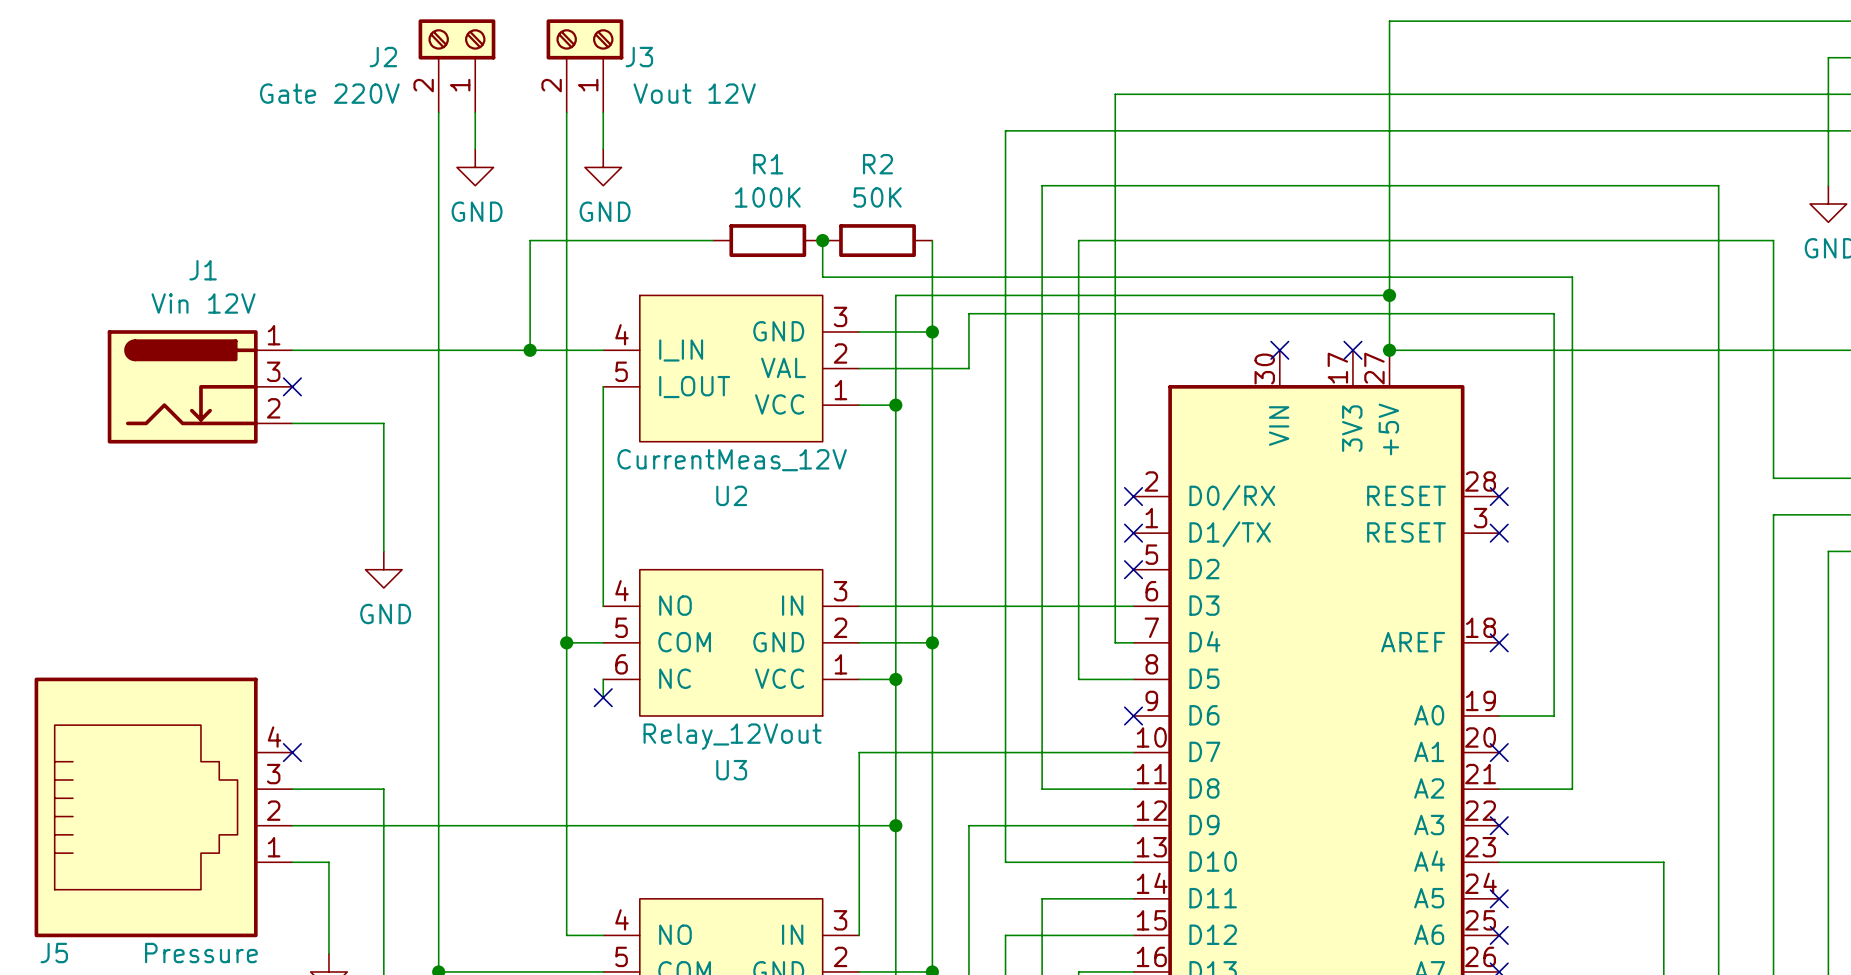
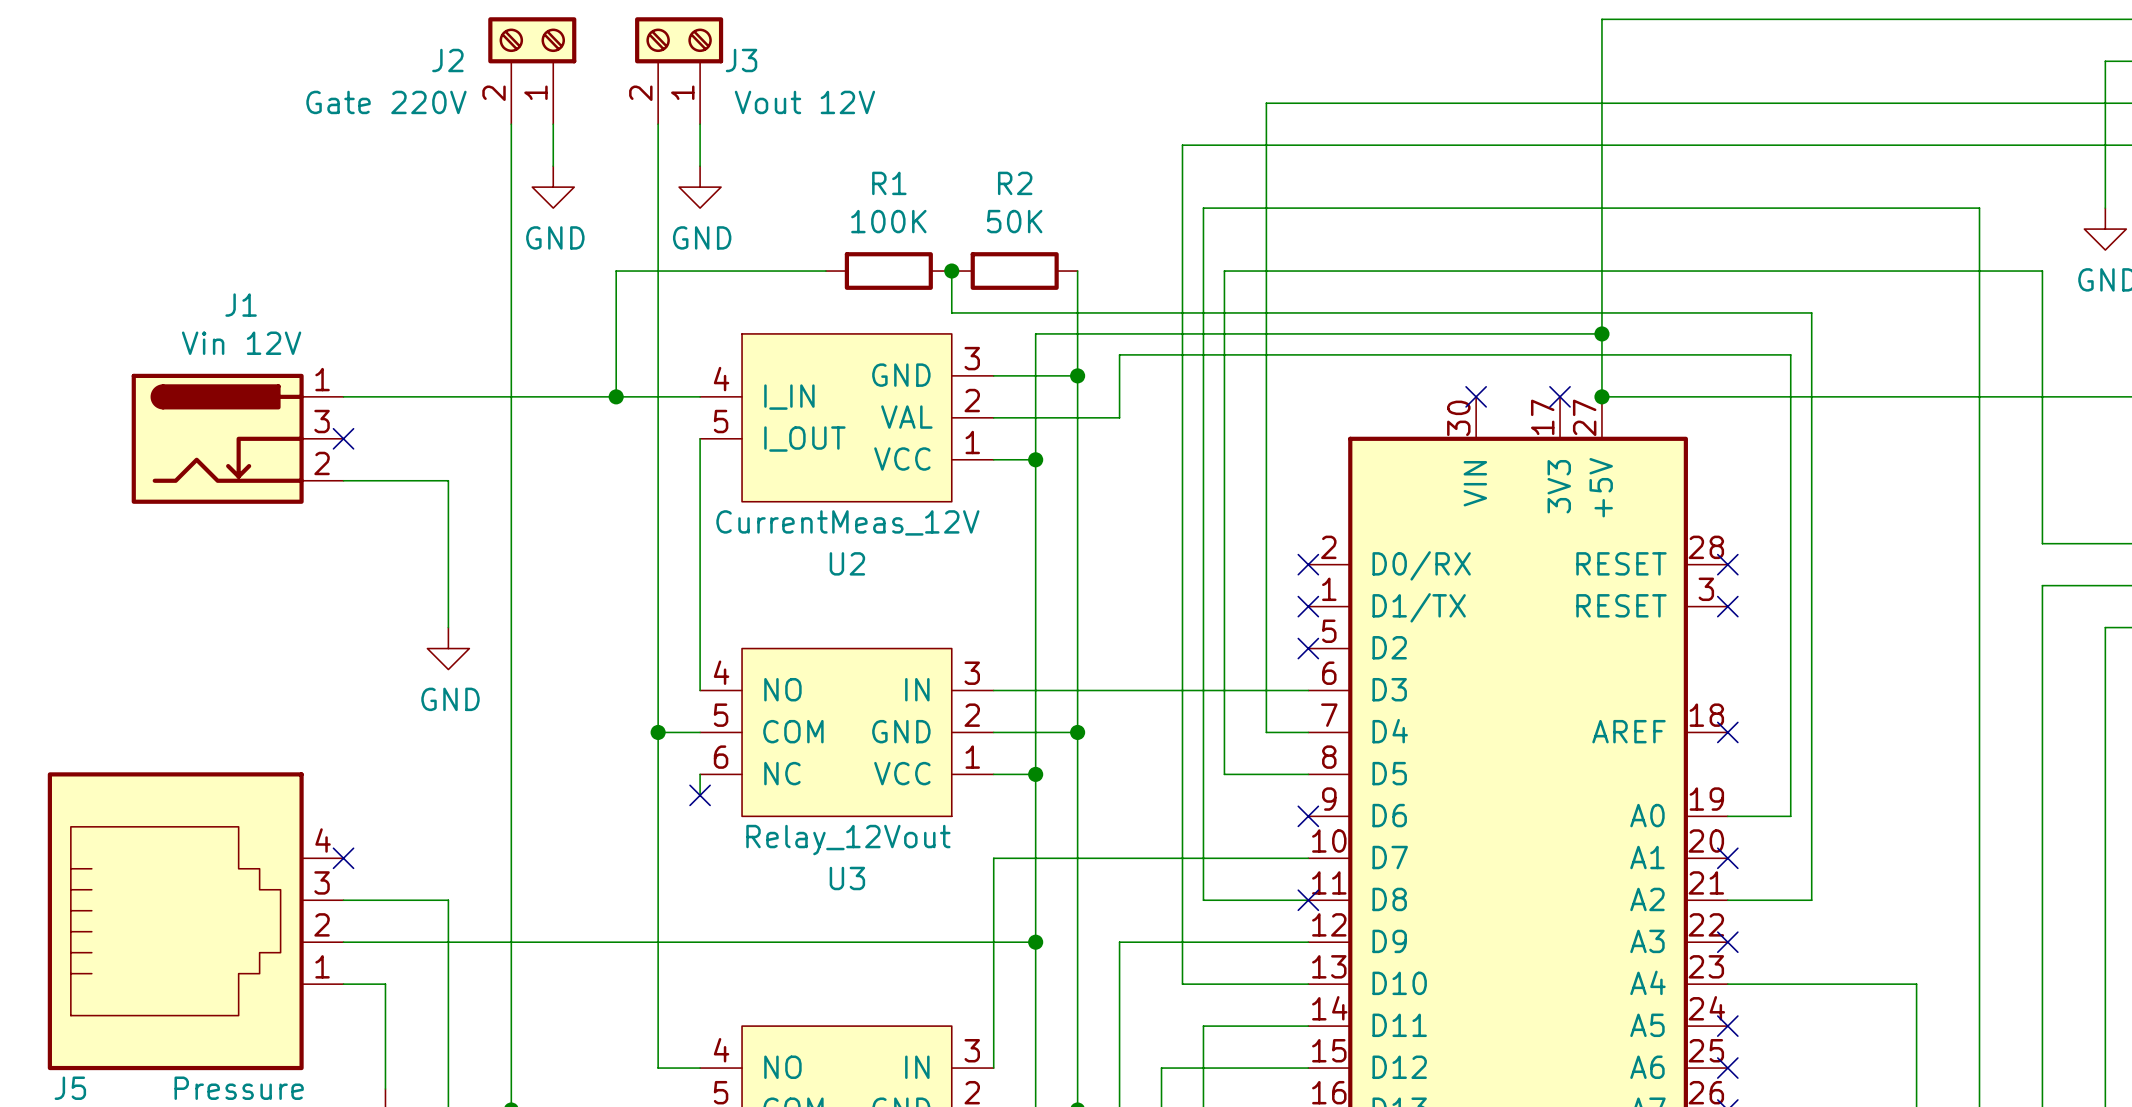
wire: (1115, 94) (1115, 642) -> (1287, 103) (1266, 103) (1266, 732) (1287, 732)
wire: (1023, 130) (1005, 130) (1005, 862) (1023, 862) -> (1182, 145) (1182, 984)
wire: (1078, 240) (1078, 679) -> (1245, 271) (1224, 271) (1224, 774) (1245, 774)
no-connect mark: none -> (1308, 900)

